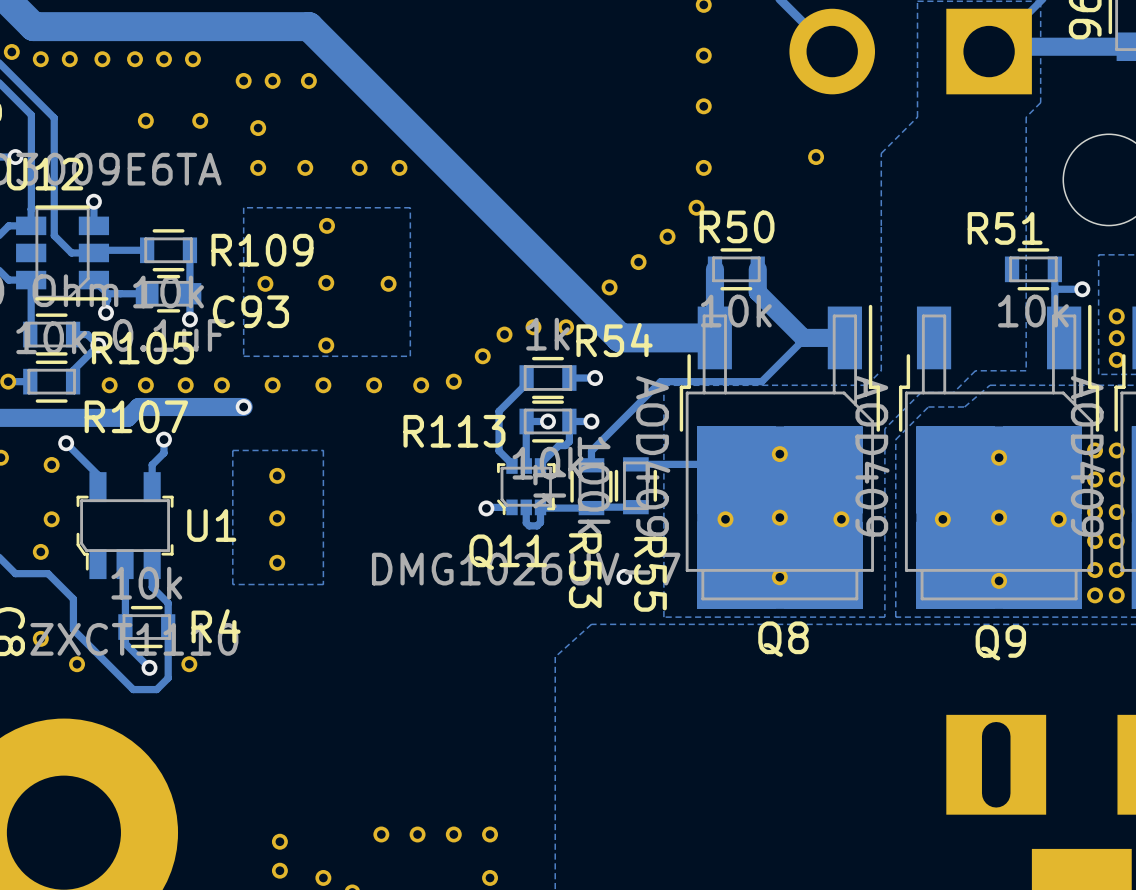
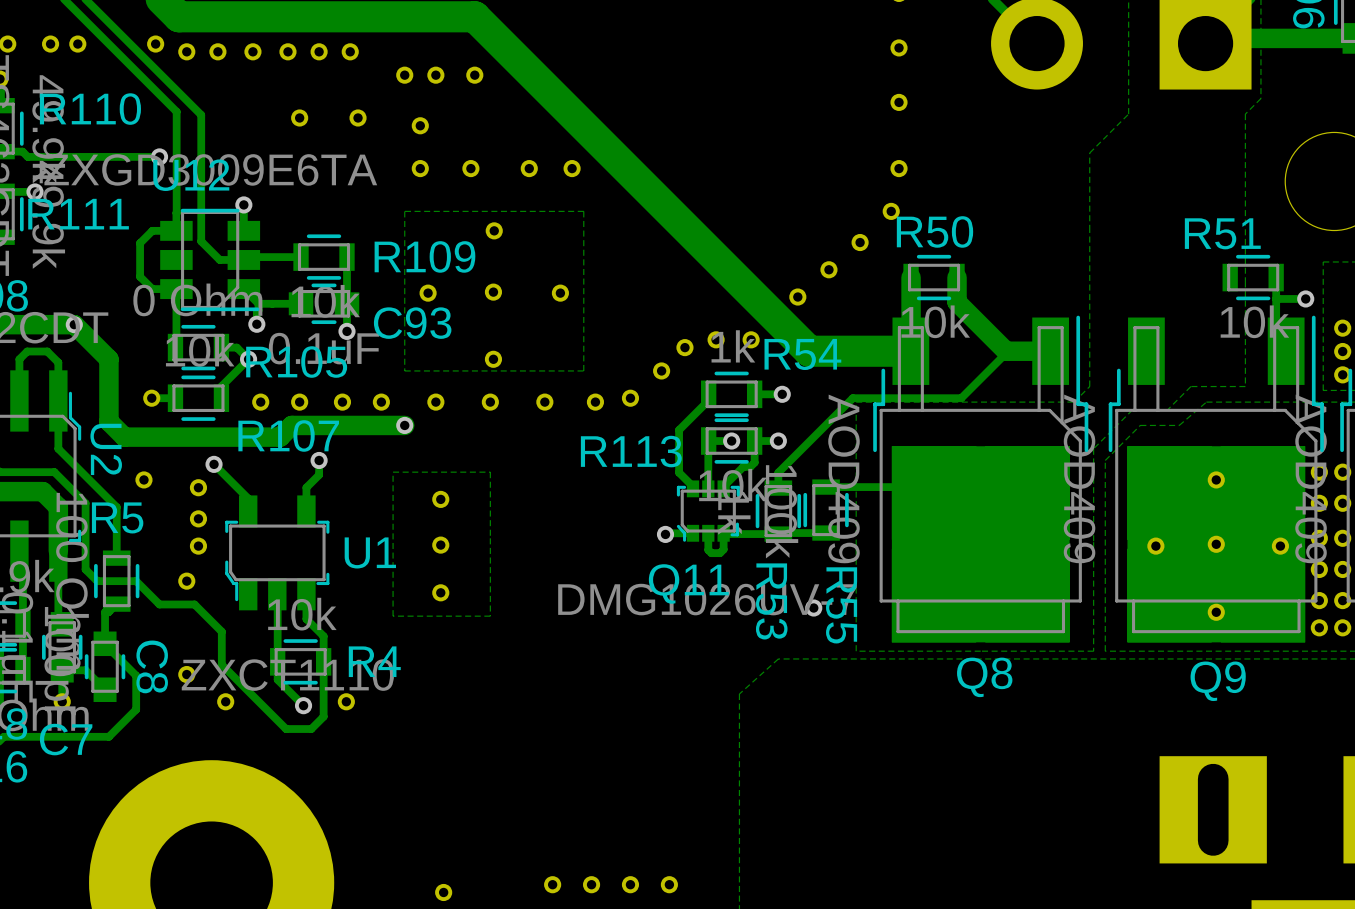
part: (816, 157) -> none
part: (779, 454) -> none
part: none -> (198, 518)
part: (779, 517) -> none
part: (725, 519) -> none
part: (841, 519) -> none
part: (779, 577) -> none

